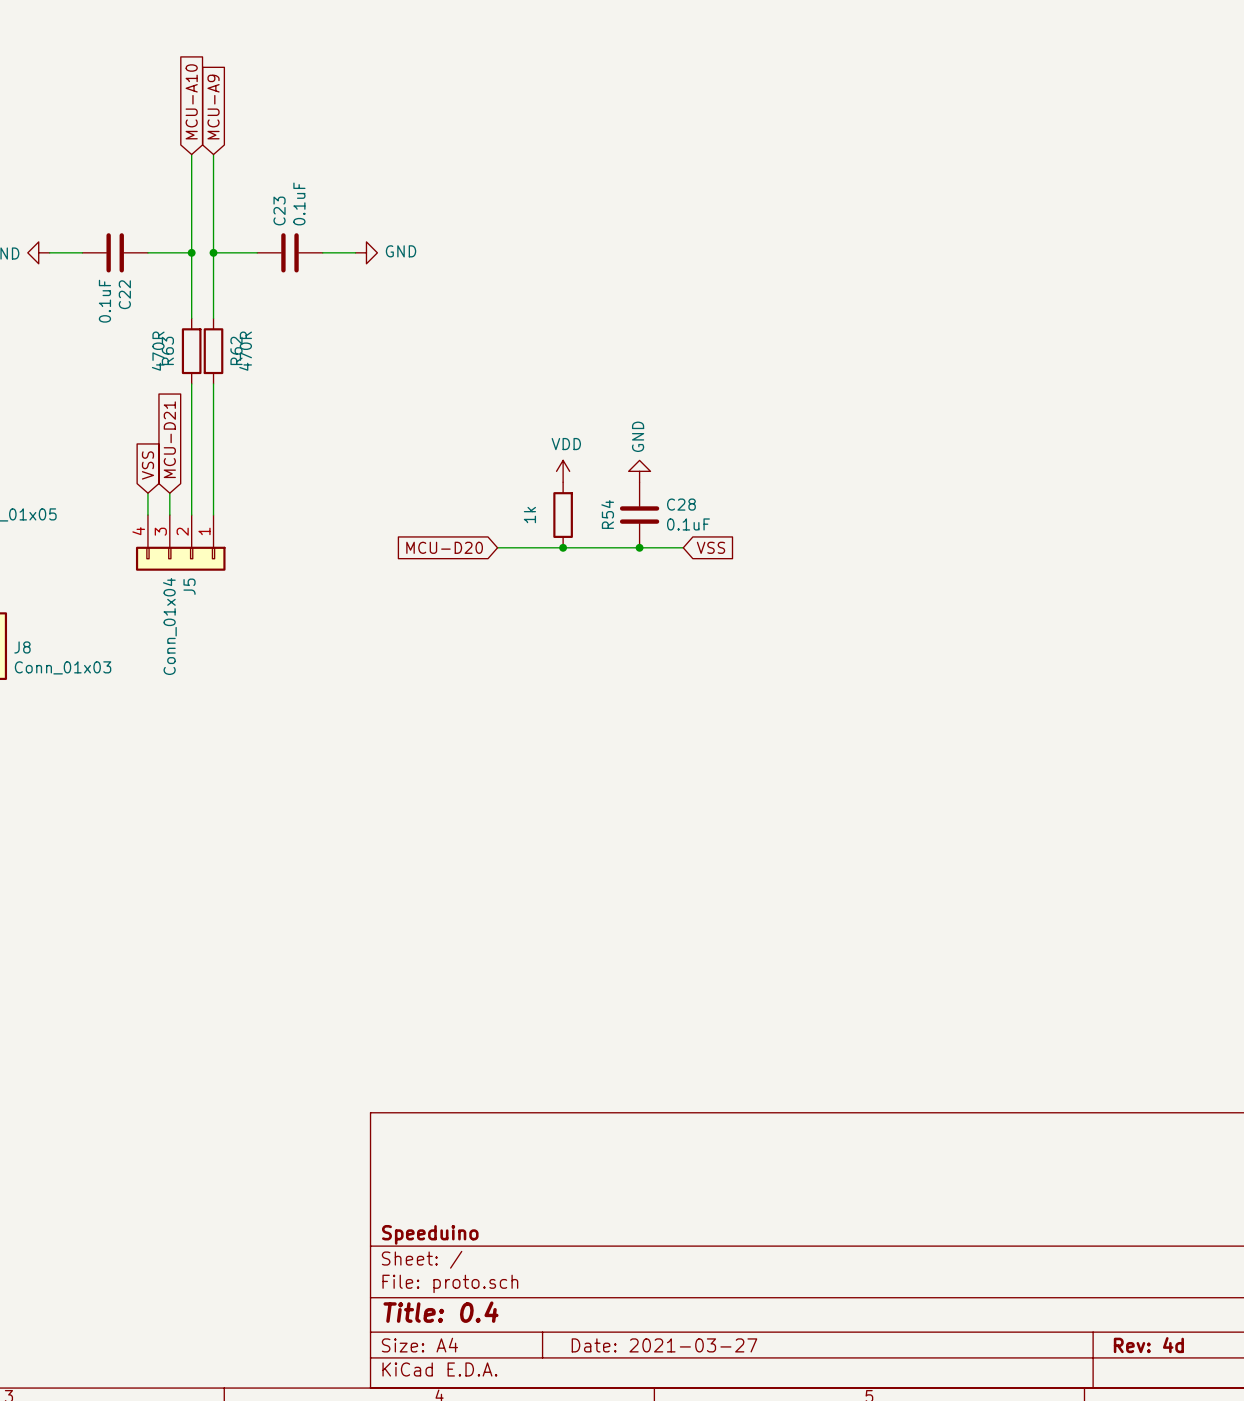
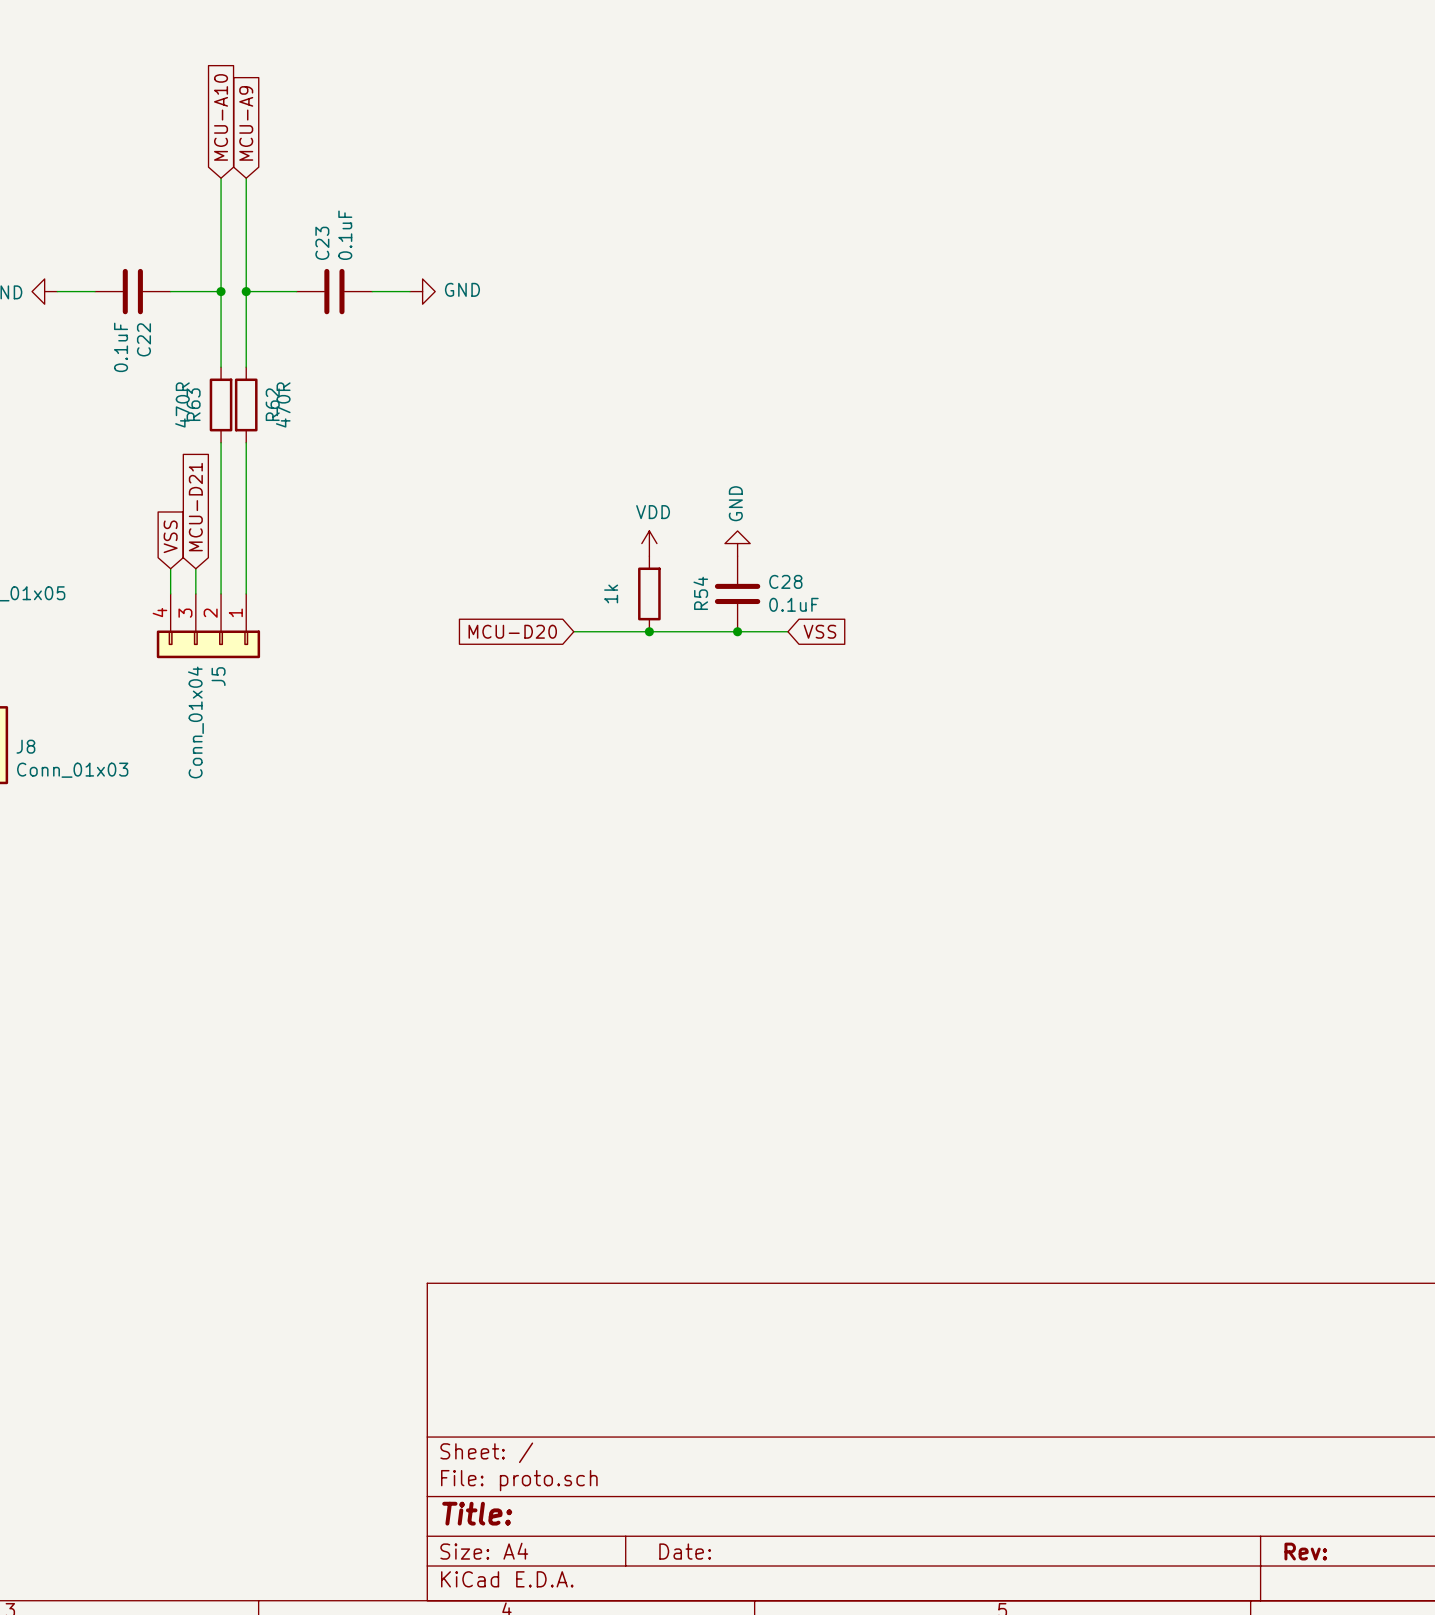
title block: Speeduino (430, 1234) -> none
title block: Title: 0.4 (440, 1312) -> Title: (477, 1513)
title block: Date: 2021-03-27 (664, 1345) -> Date: (685, 1551)
title block: Rev: 4d (1148, 1345) -> Rev: (1305, 1551)

